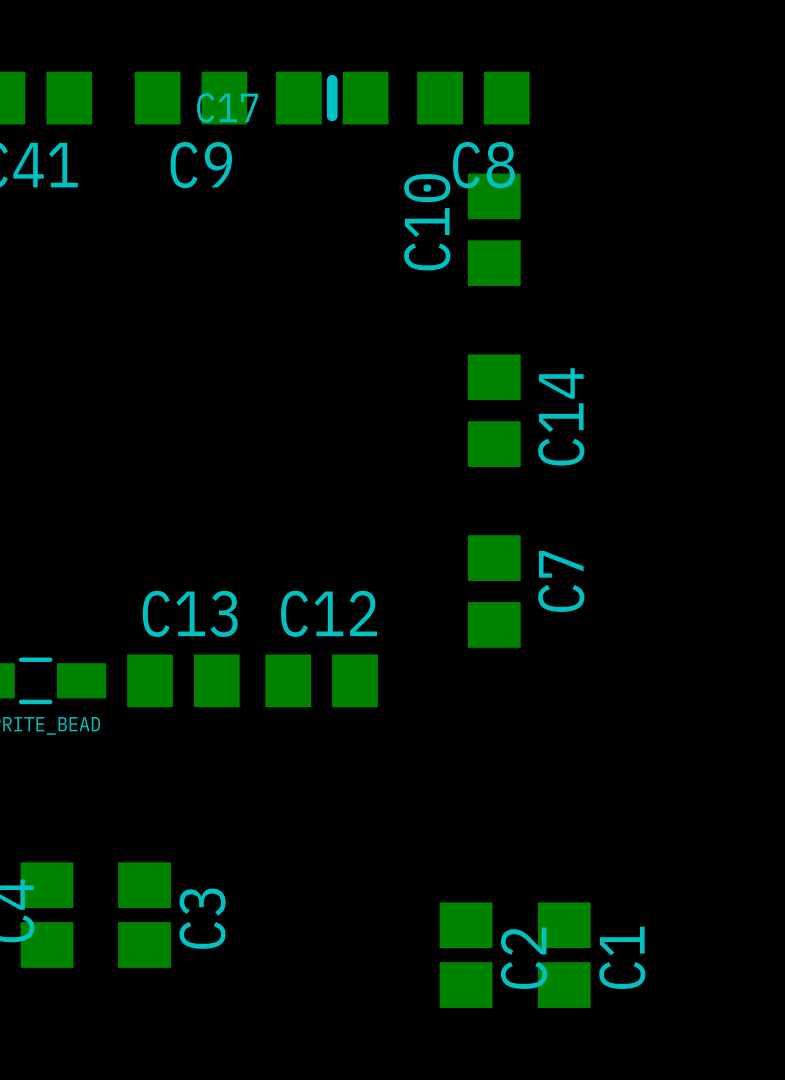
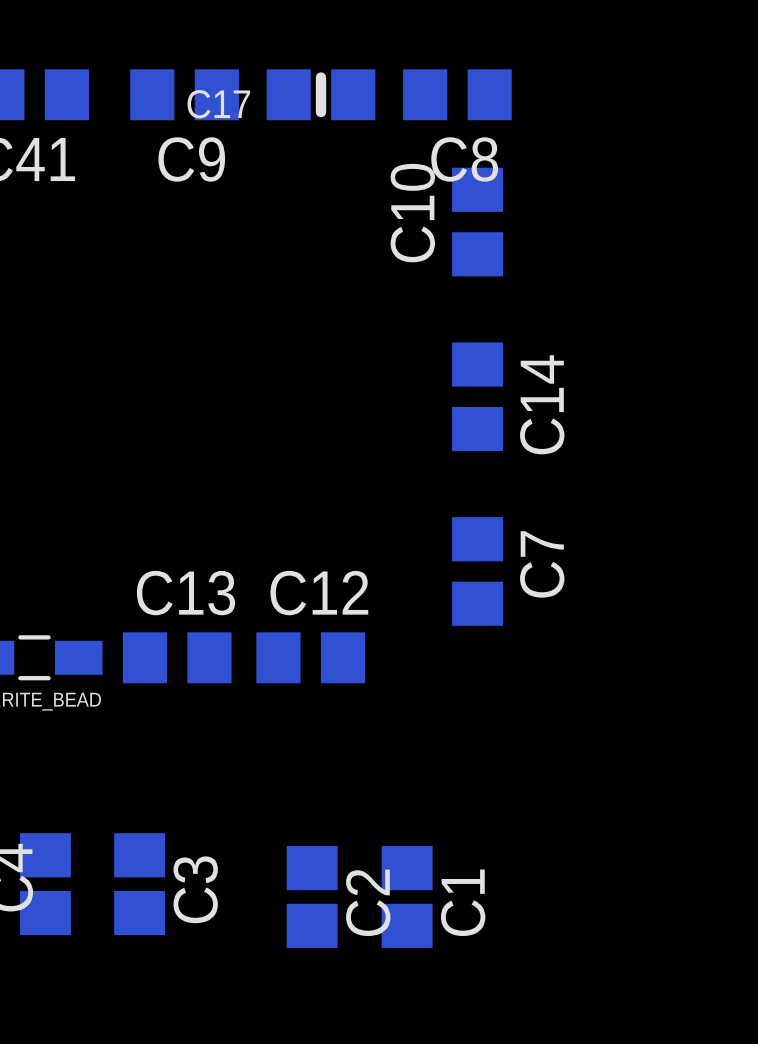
C2 position: (466, 955) -> (312, 896)
C1 position: (564, 955) -> (407, 896)

